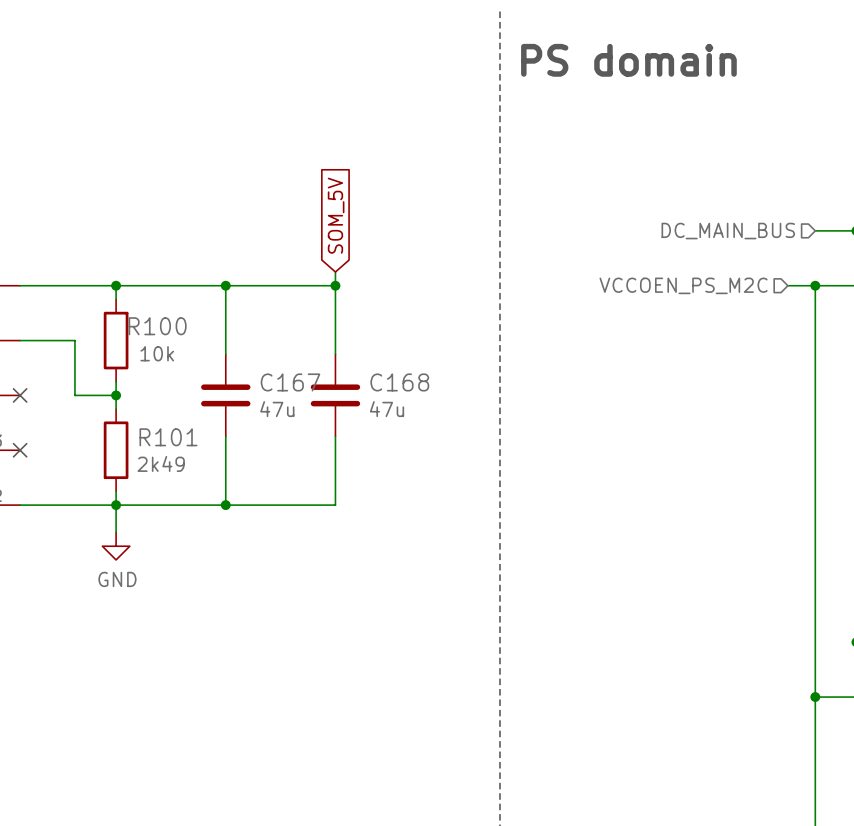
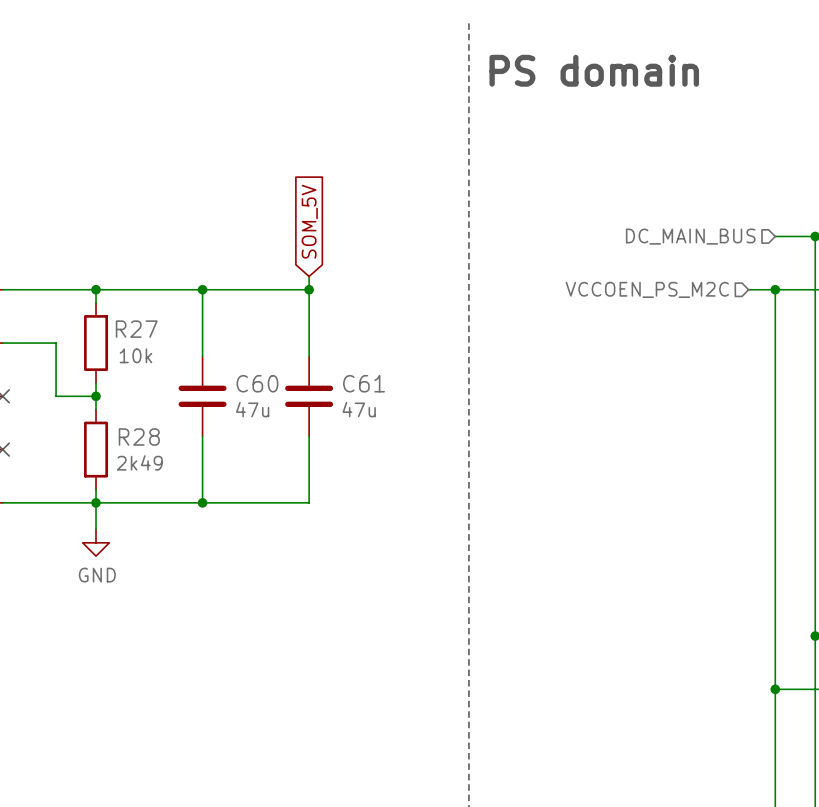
R100 name: R100 (157, 326) -> R27 (136, 329)
C167 name: C167 (290, 382) -> C60 (257, 383)
C168 name: C168 (399, 382) -> C61 (364, 383)
R101 name: R101 (168, 437) -> R28 (139, 437)

